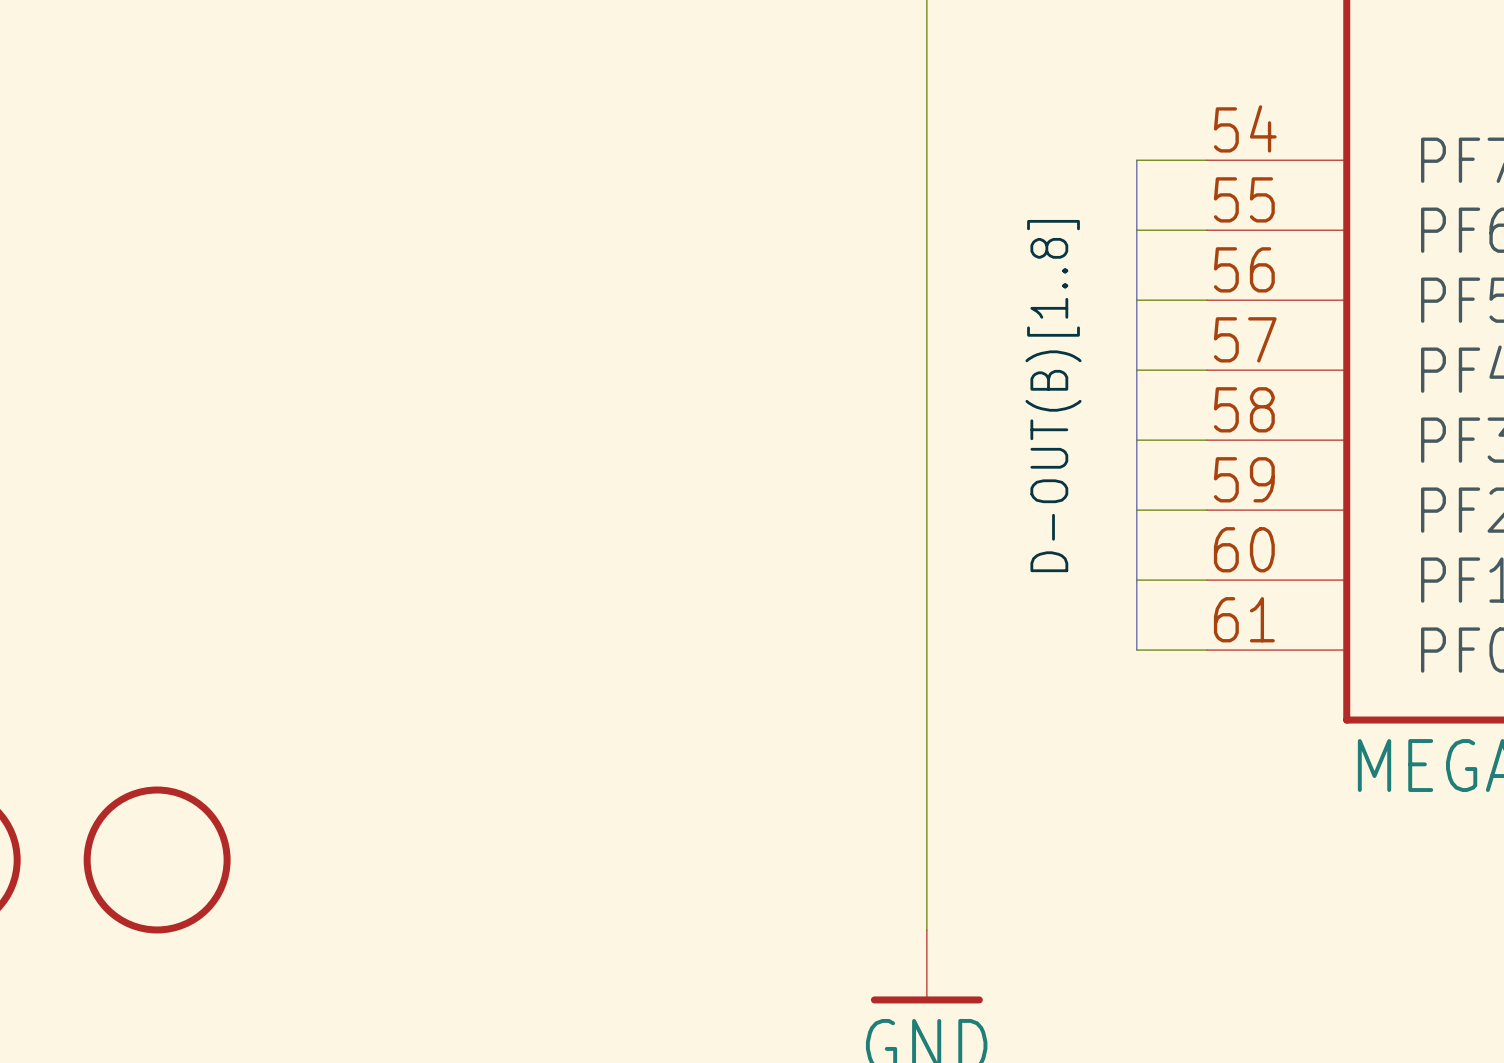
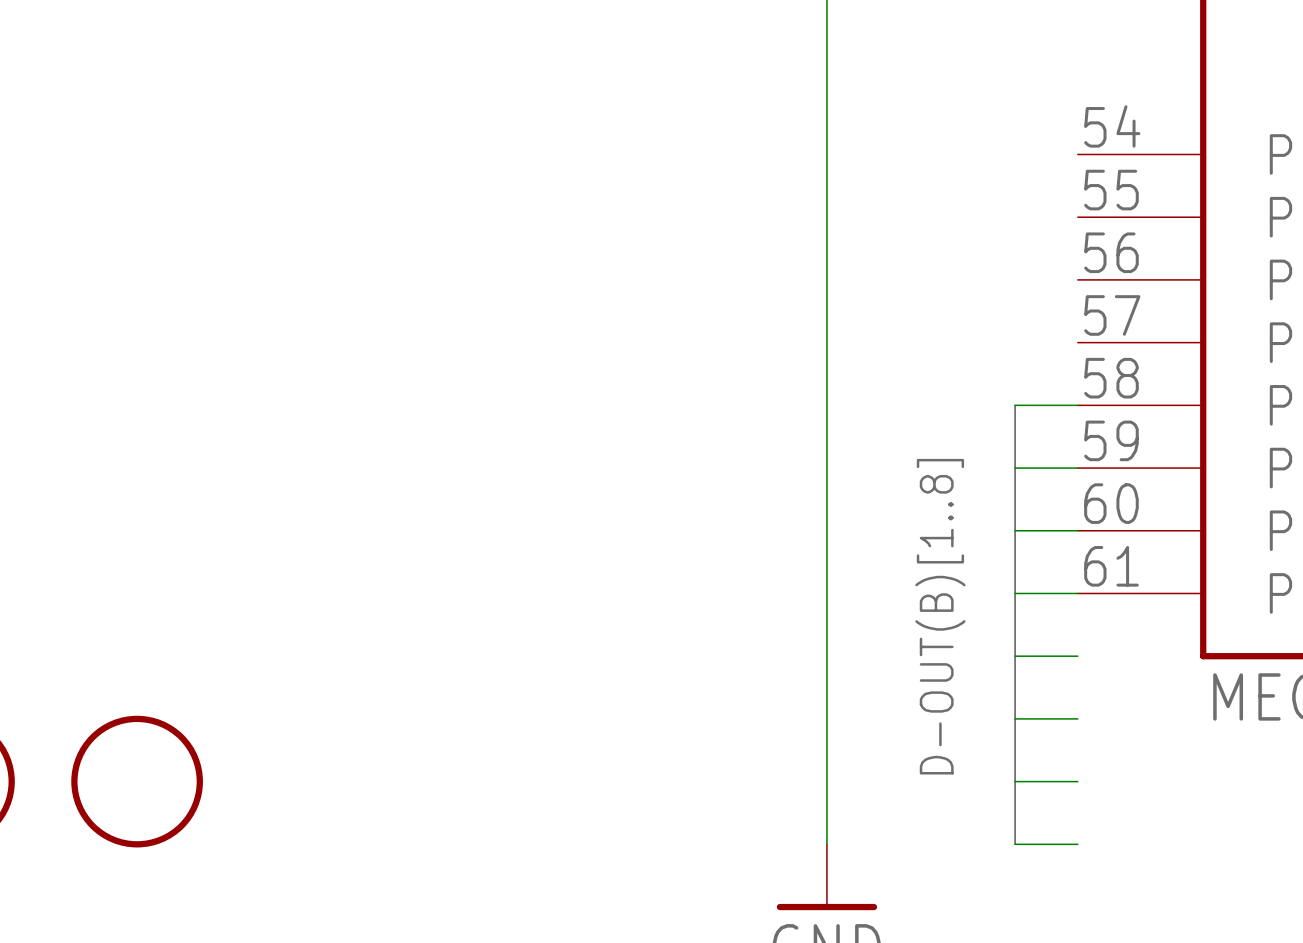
bus: (1136, 160) (1136, 440) -> (1015, 593) (1015, 844)
wire: (1136, 160) (1206, 160) -> (1015, 656) (1077, 656)
wire: (1136, 230) (1206, 230) -> (1015, 718) (1077, 718)
wire: (1136, 300) (1206, 300) -> (1015, 781) (1077, 781)
wire: (1136, 370) (1206, 370) -> (1015, 844) (1077, 844)
label position: D-OUT(B)[1..8] (1053, 396) -> D-OUT(B)[1..8] (940, 616)

